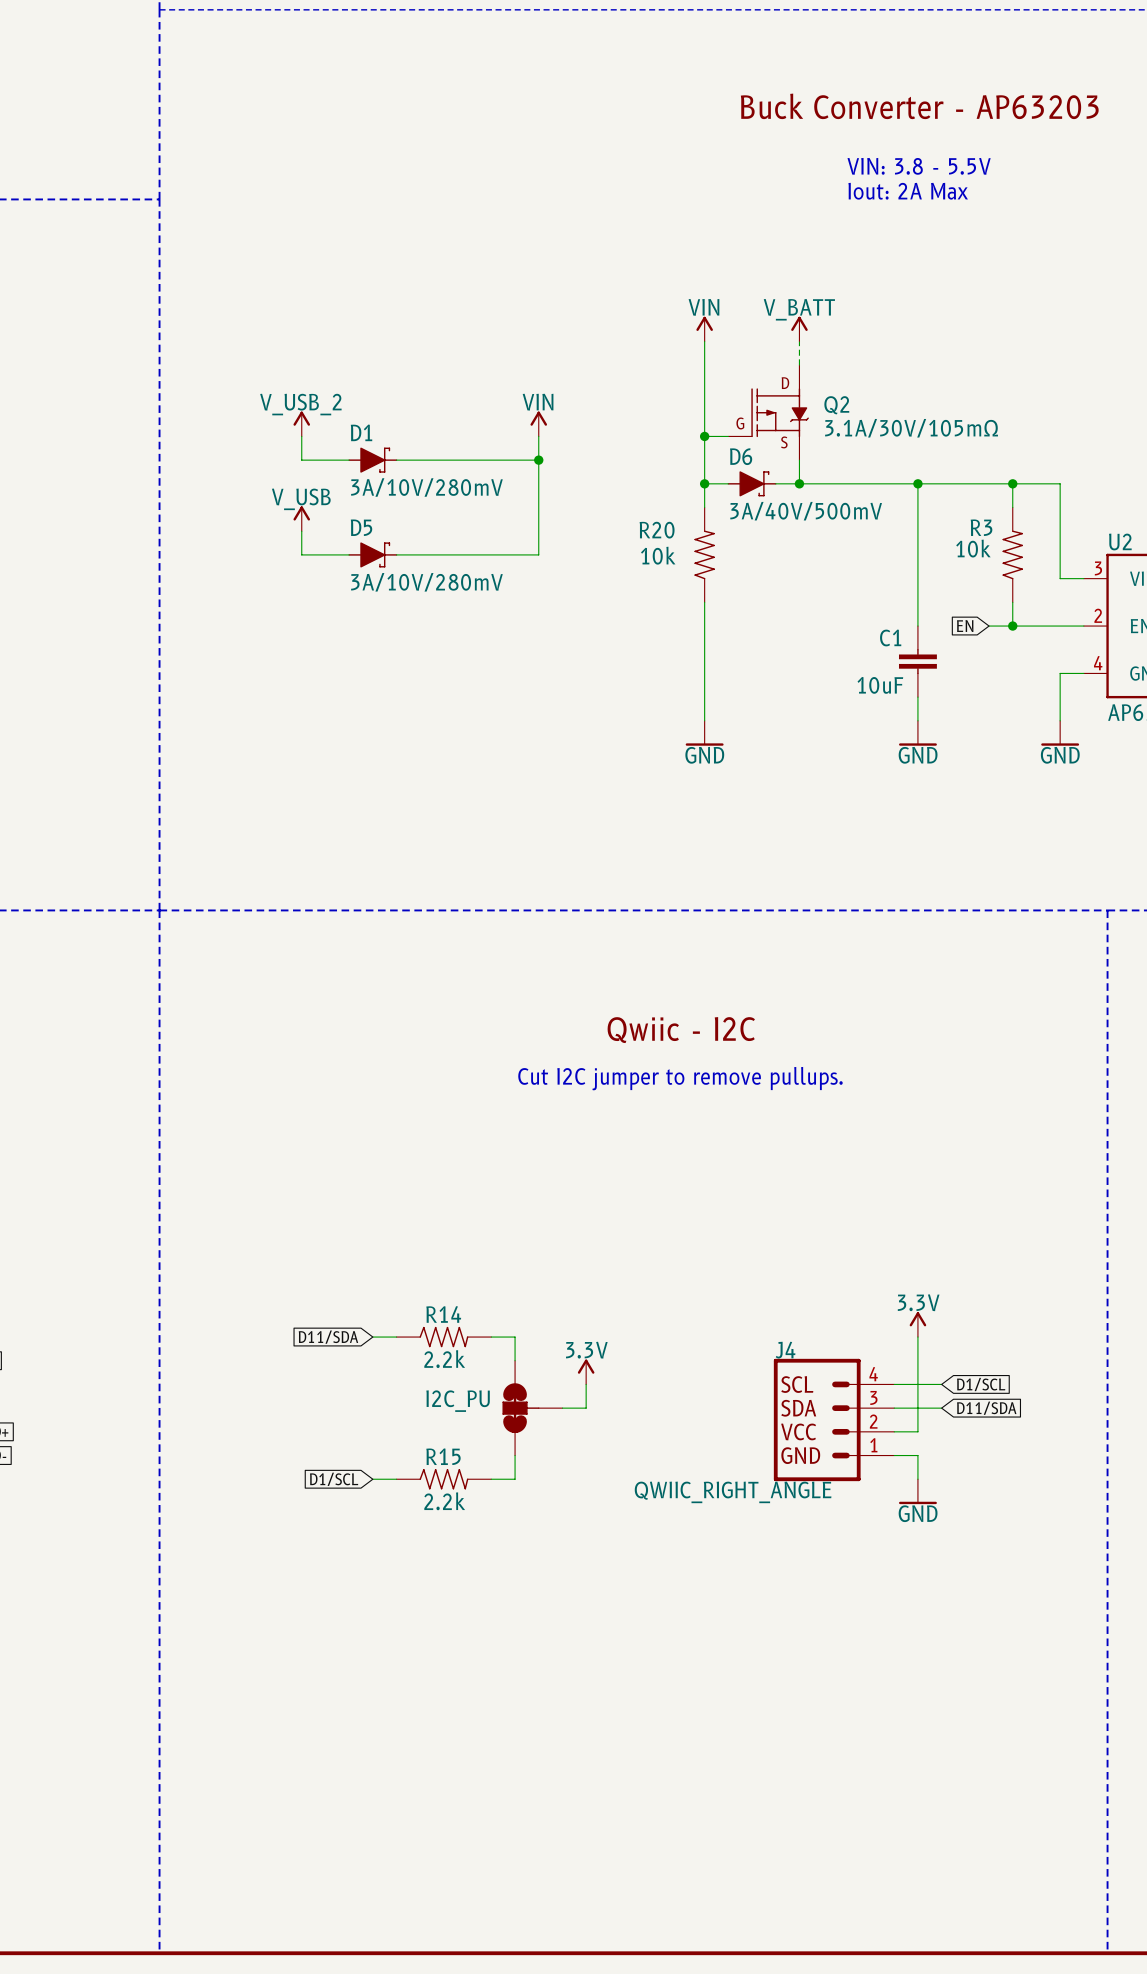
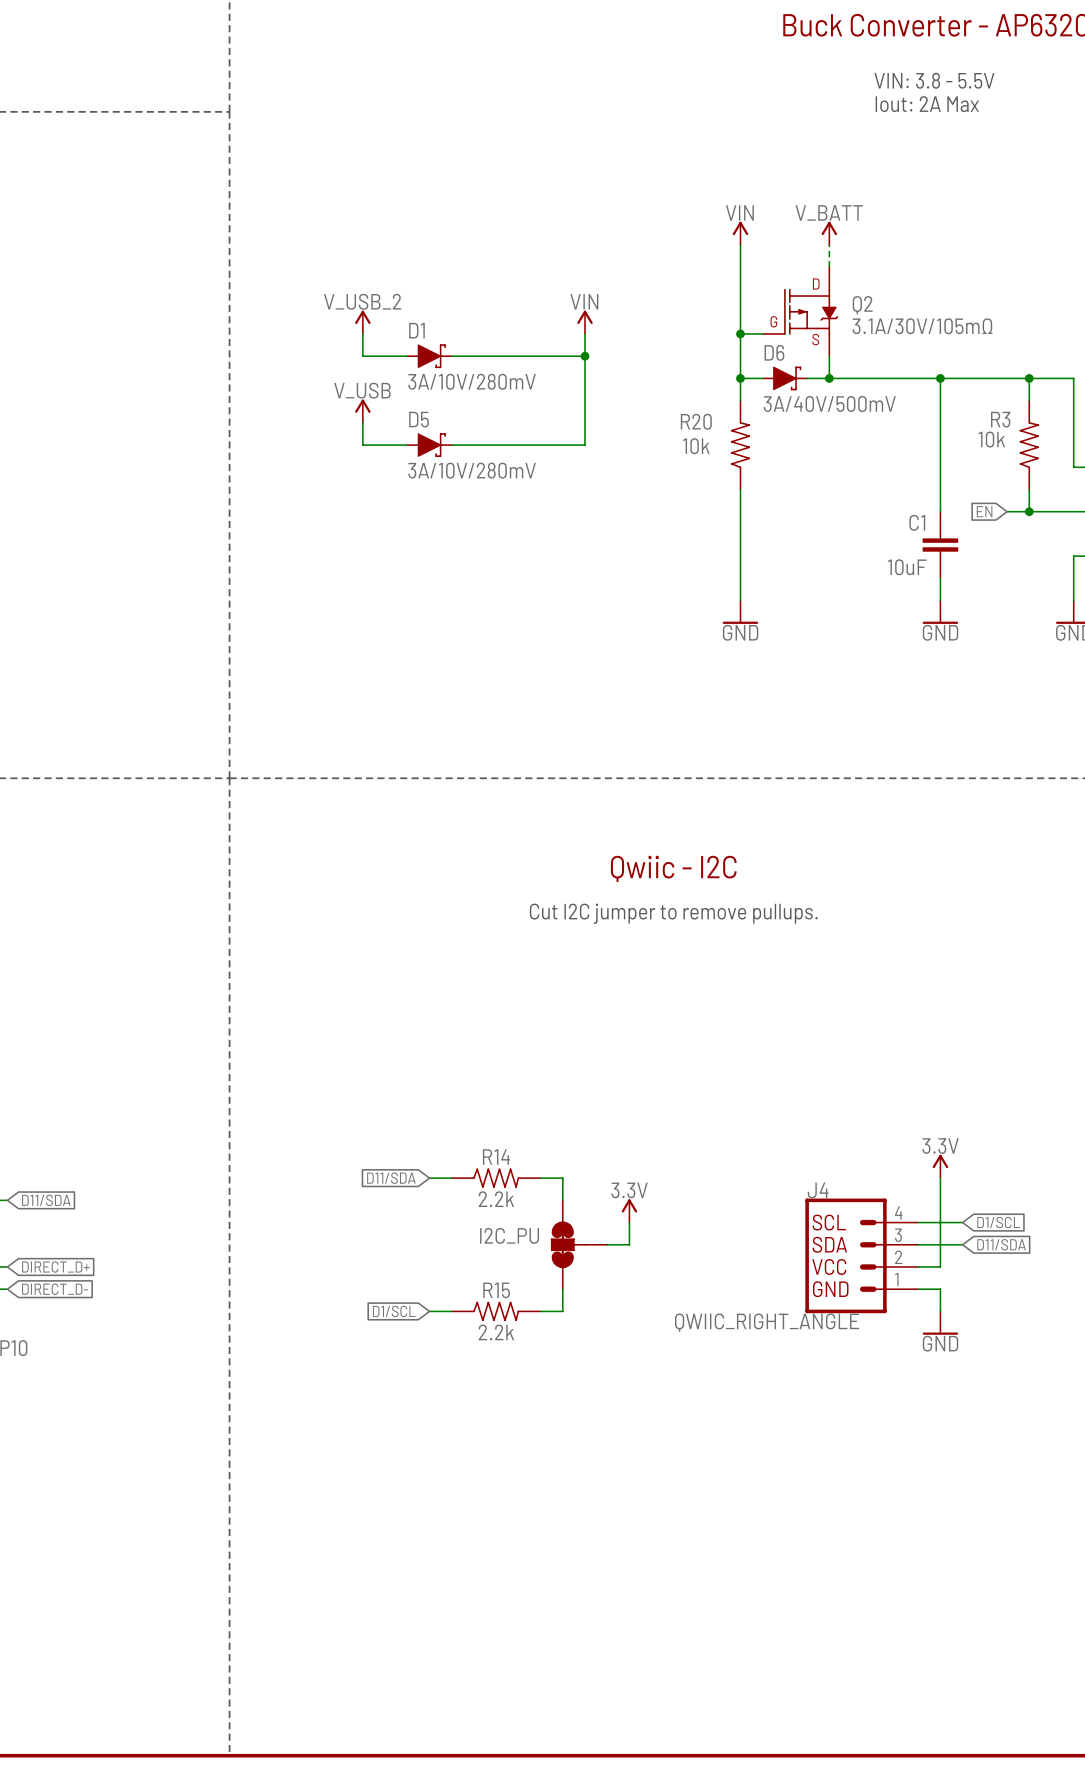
text position: Qwiic - I2C (681, 1030) -> Qwiic - I2C (673, 868)
text position: Cut I2C jumper to remove pullups. (680, 1078) -> Cut I2C jumper to remove pullups. (673, 913)

